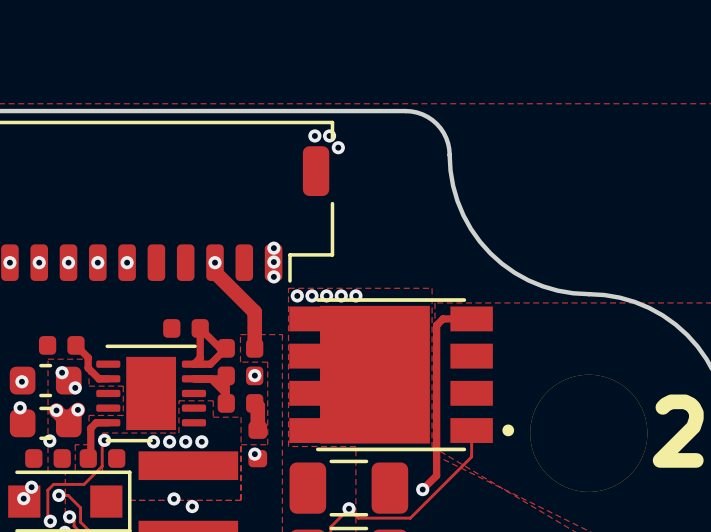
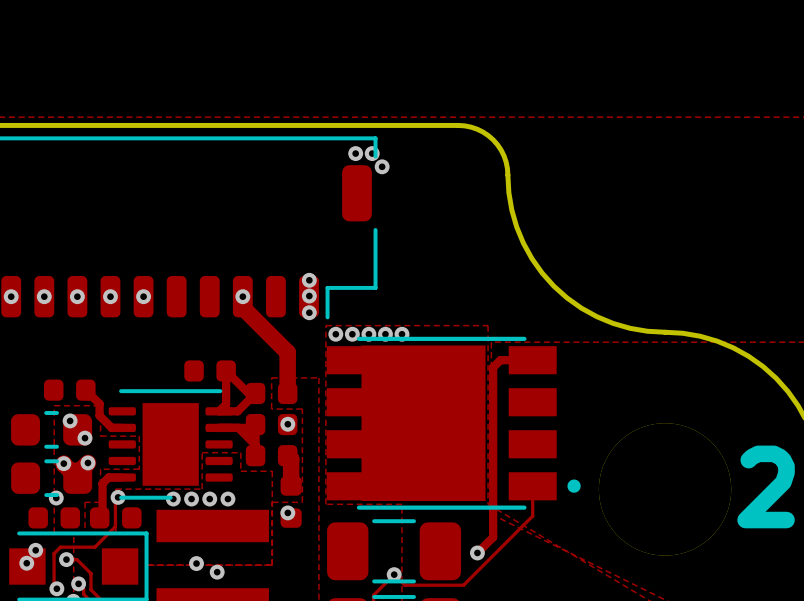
via: (21, 381) -> none
via: (20, 407) -> none

